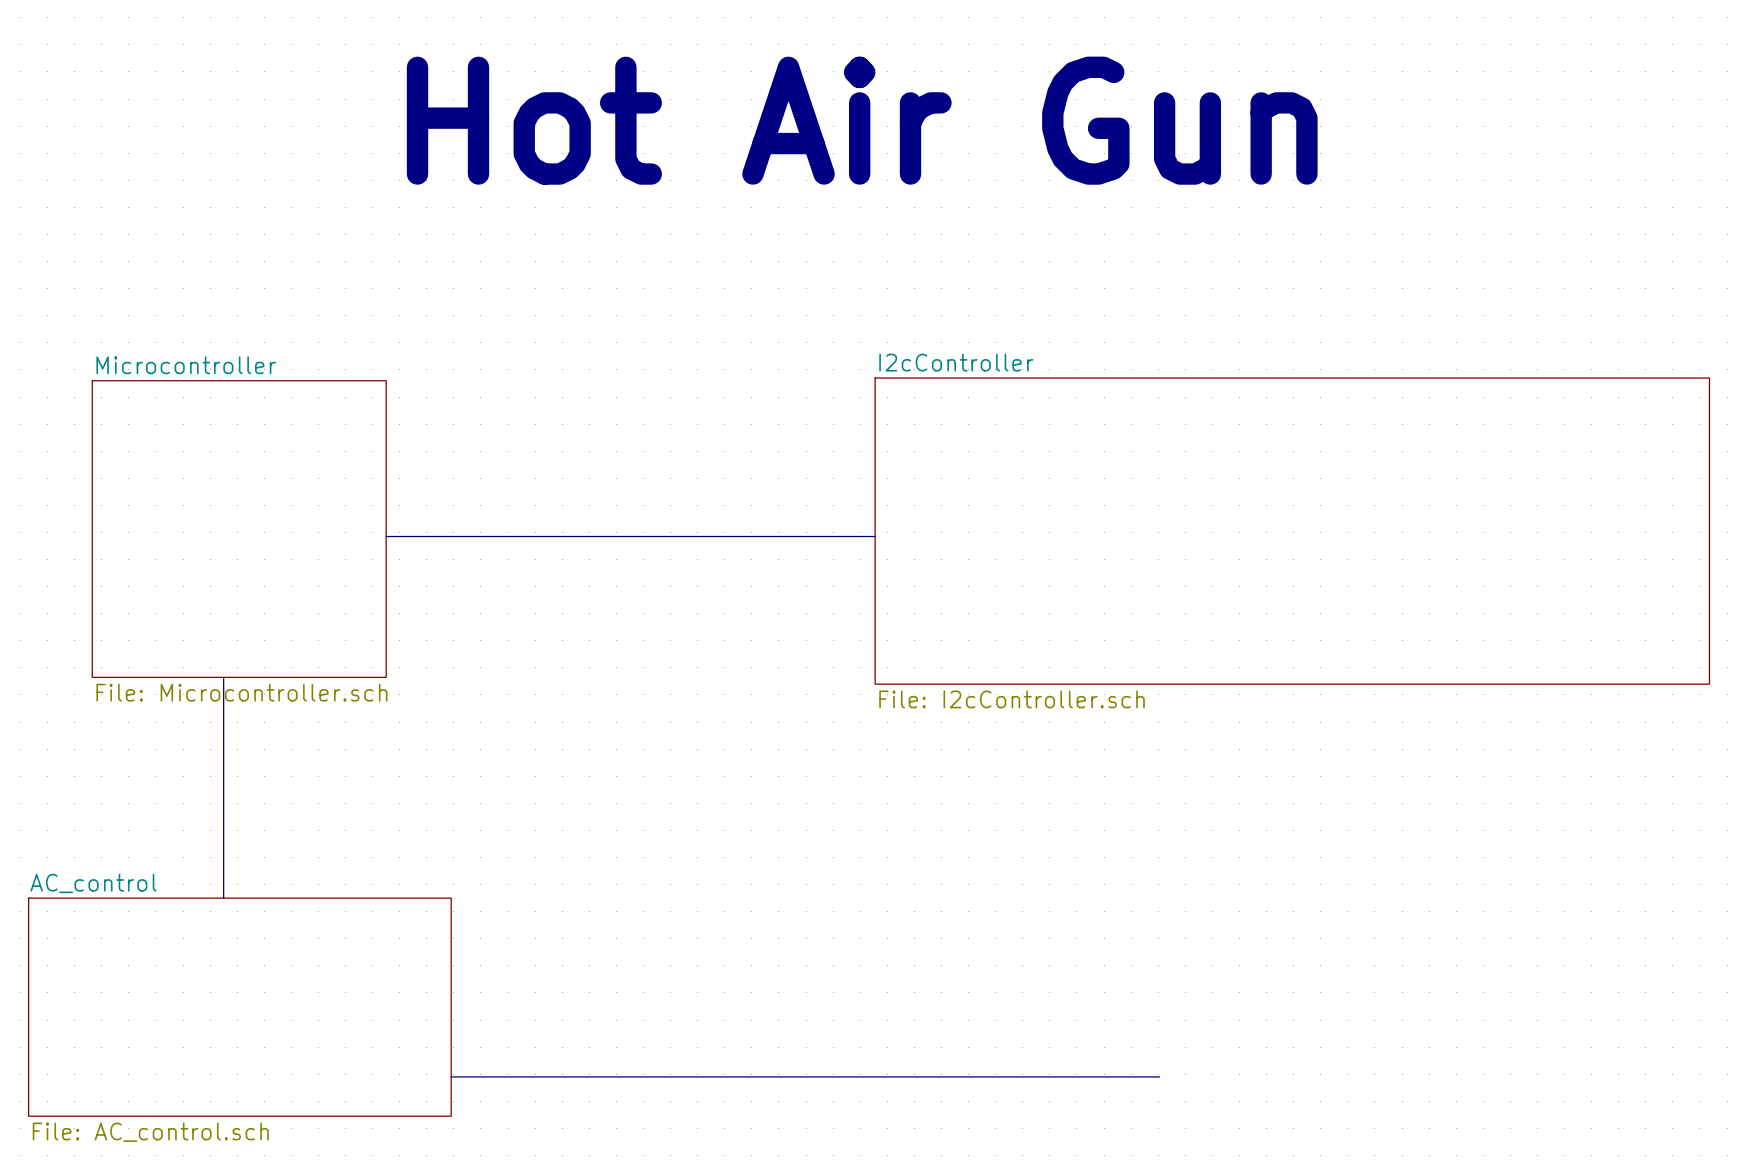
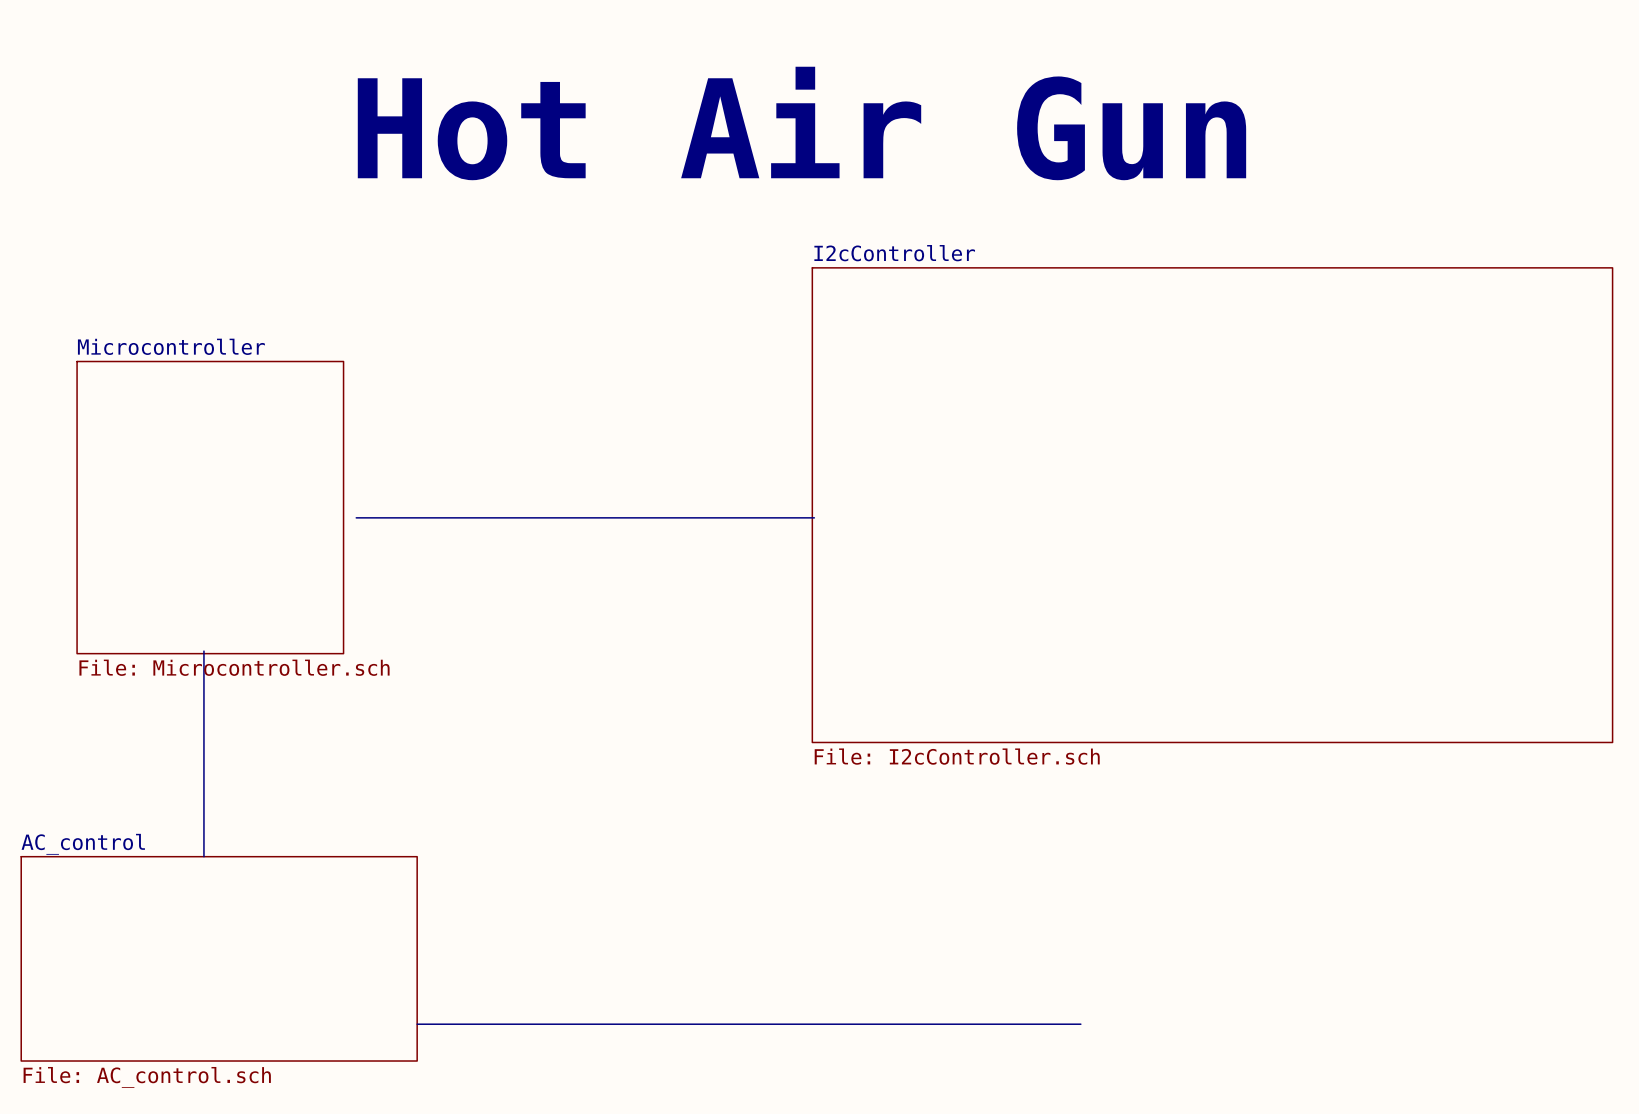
sheet I2cController name position: I2cController (956, 362) -> I2cController (894, 253)
sheet I2cController shape: [875, 378, 1710, 685] -> [812, 267, 1613, 743]
sheet Microcontroller shape: [92, 380, 387, 678] -> [77, 361, 344, 654]
sheet I2cController value position: File: I2cController.sch (1012, 699) -> File: I2cController.sch (957, 756)

